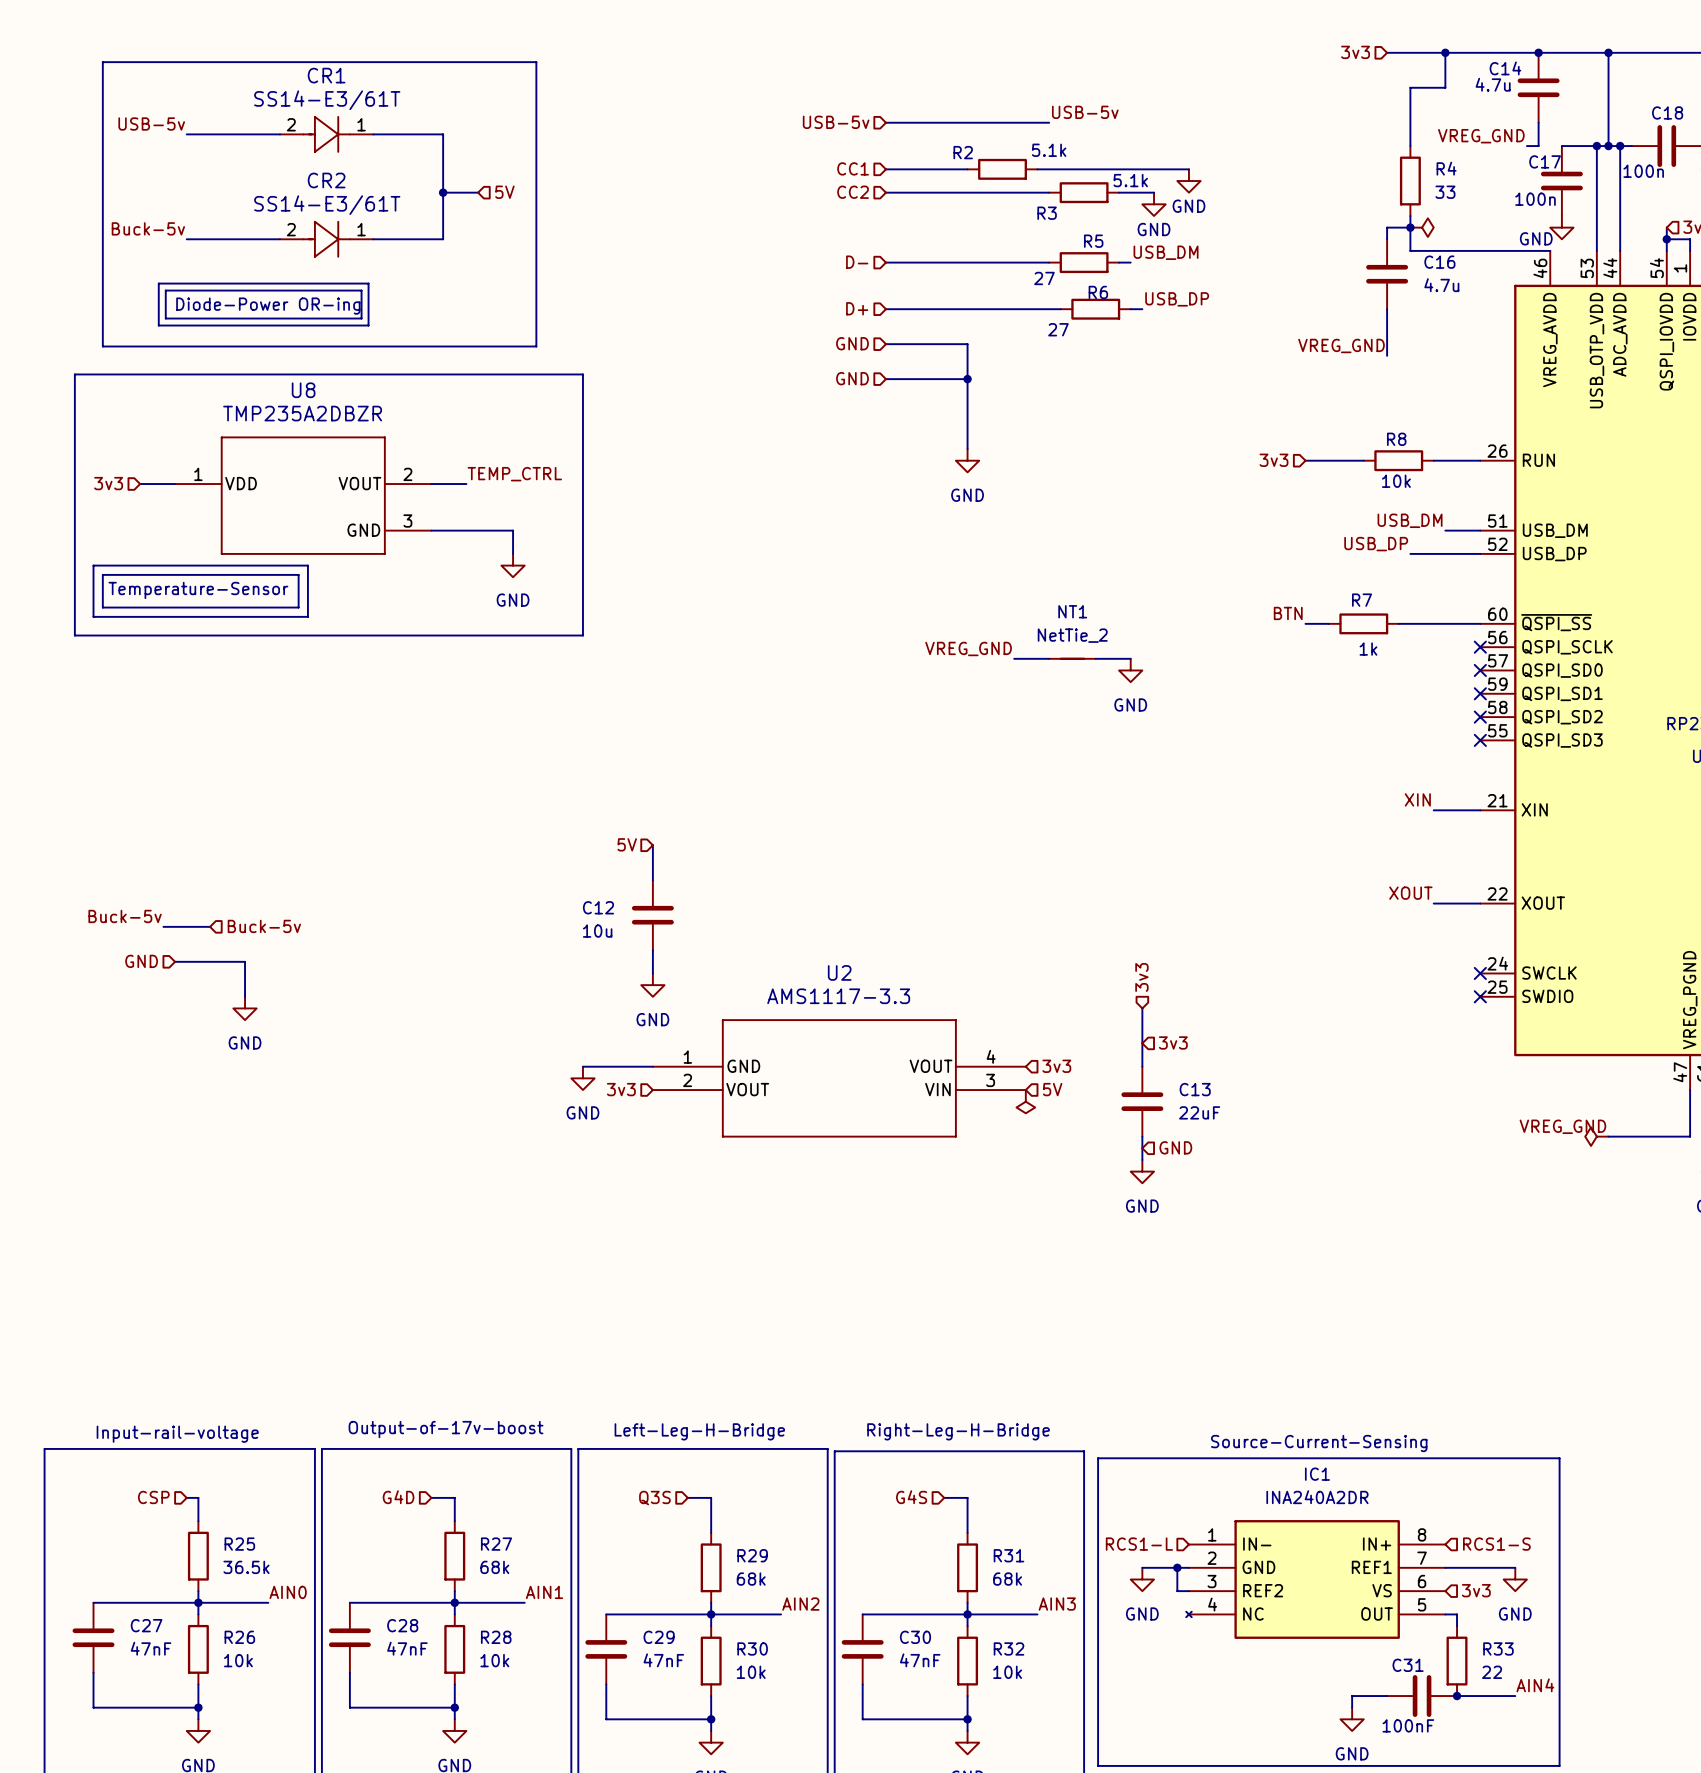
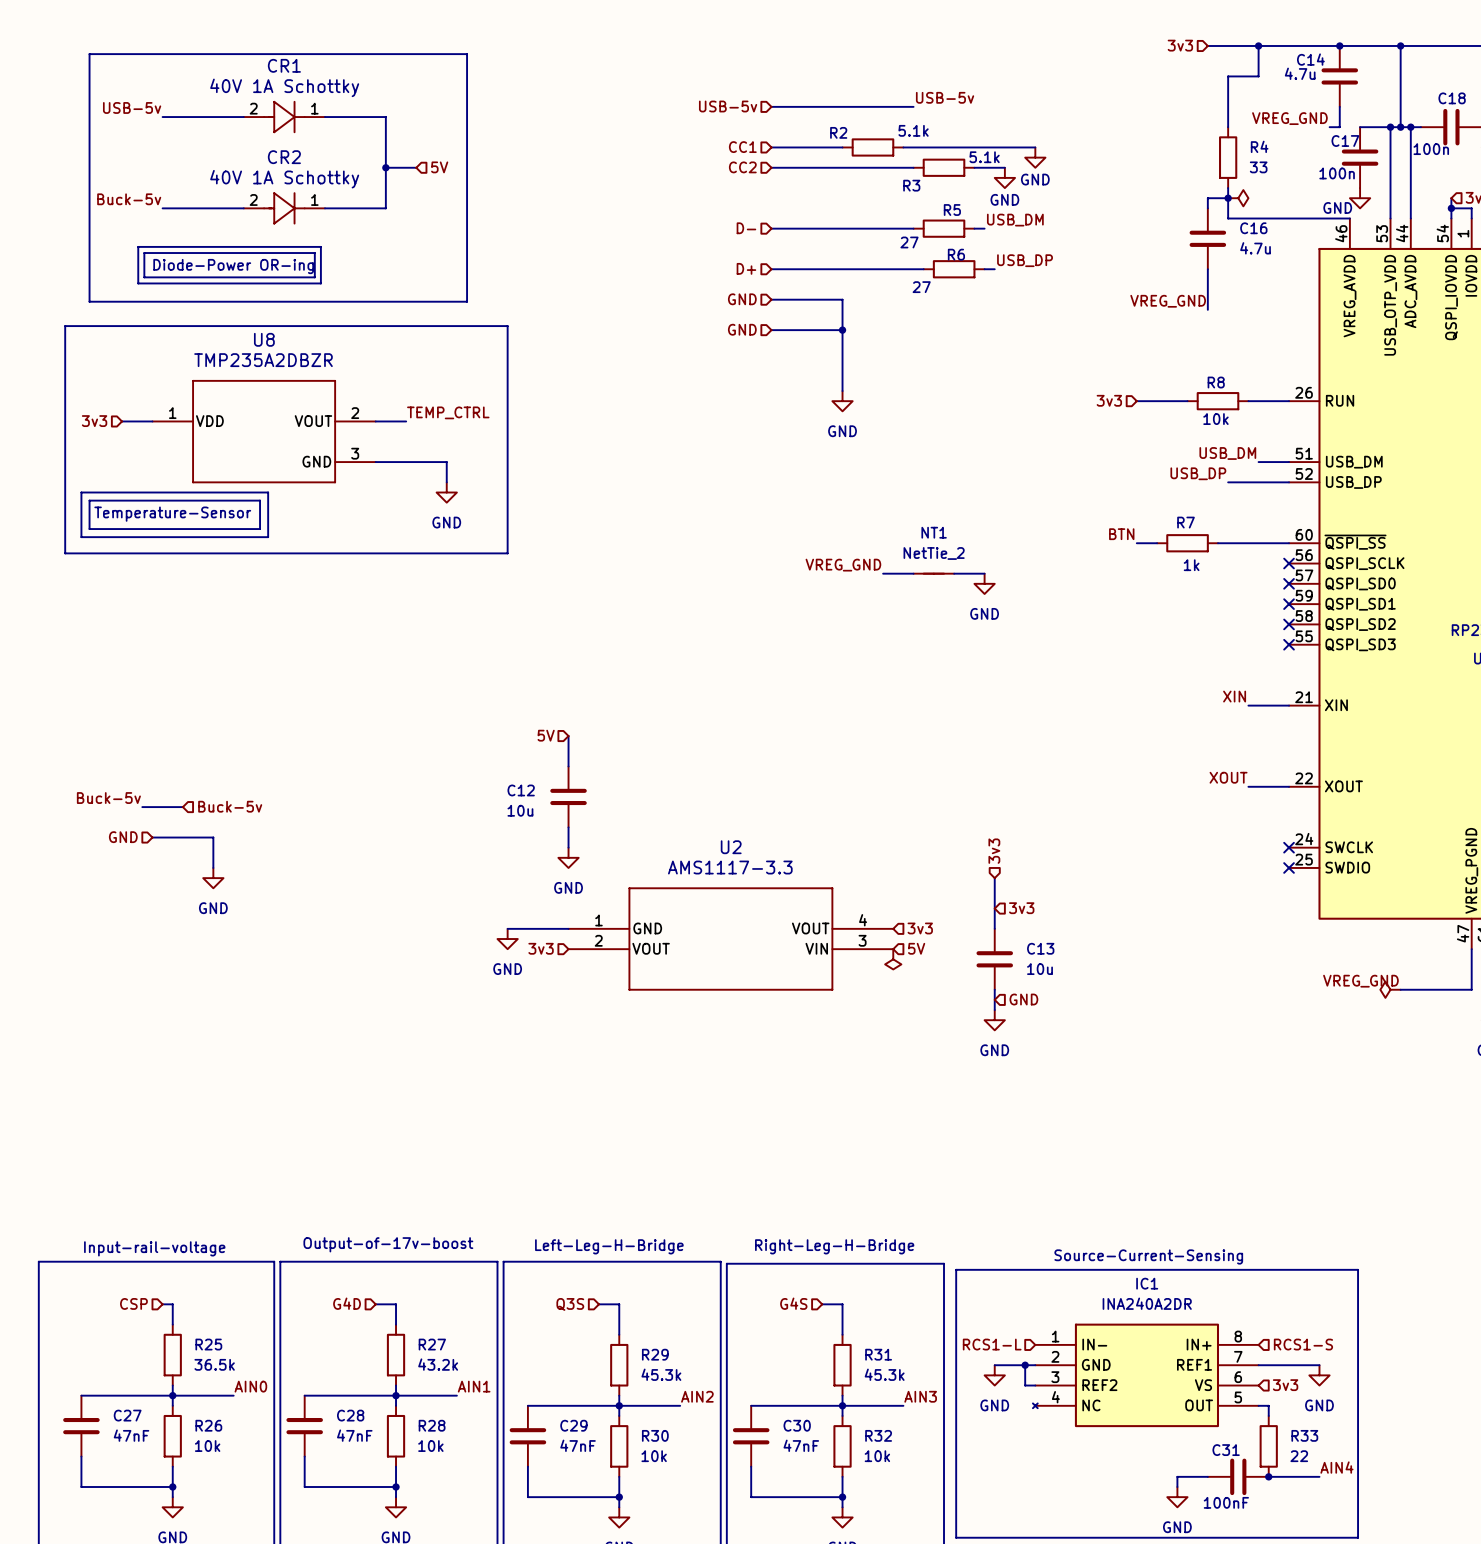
CR1 value: SS14-E3/61T (327, 100) -> 40V 1A Schottky (284, 87)
CR2 value: SS14-E3/61T (327, 205) -> 40V 1A Schottky (284, 179)
C13 value: 22uF (1199, 1112) -> 10u (1040, 969)
R27 value: 68k (494, 1567) -> 43.2k (438, 1364)
R29 value: 68k (751, 1579) -> 45.3k (661, 1374)
R31 value: 68k (1007, 1579) -> 45.3k (884, 1374)

